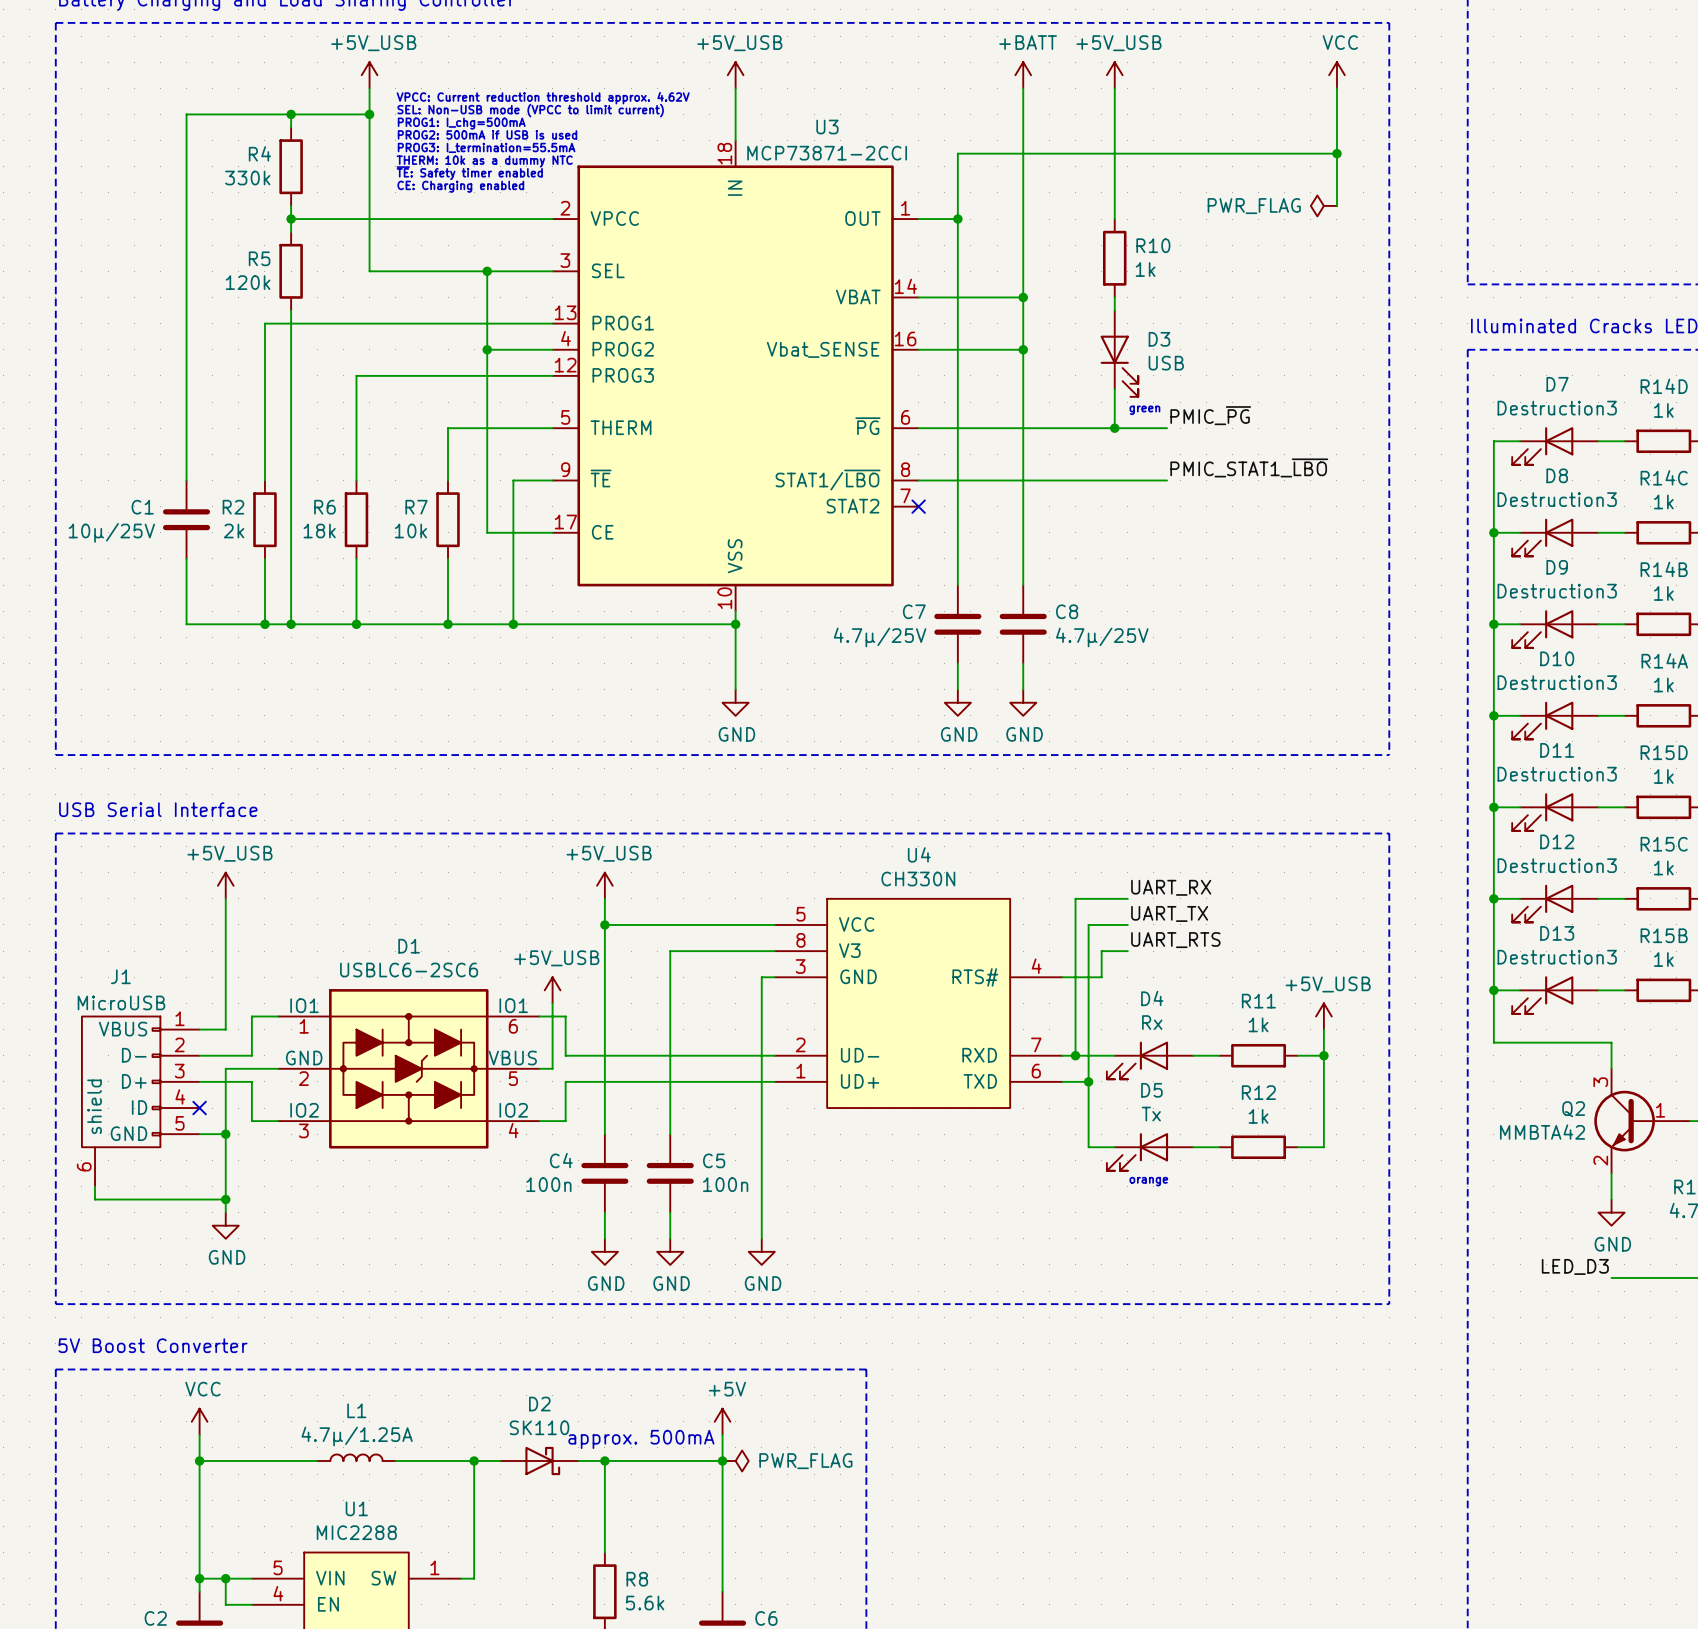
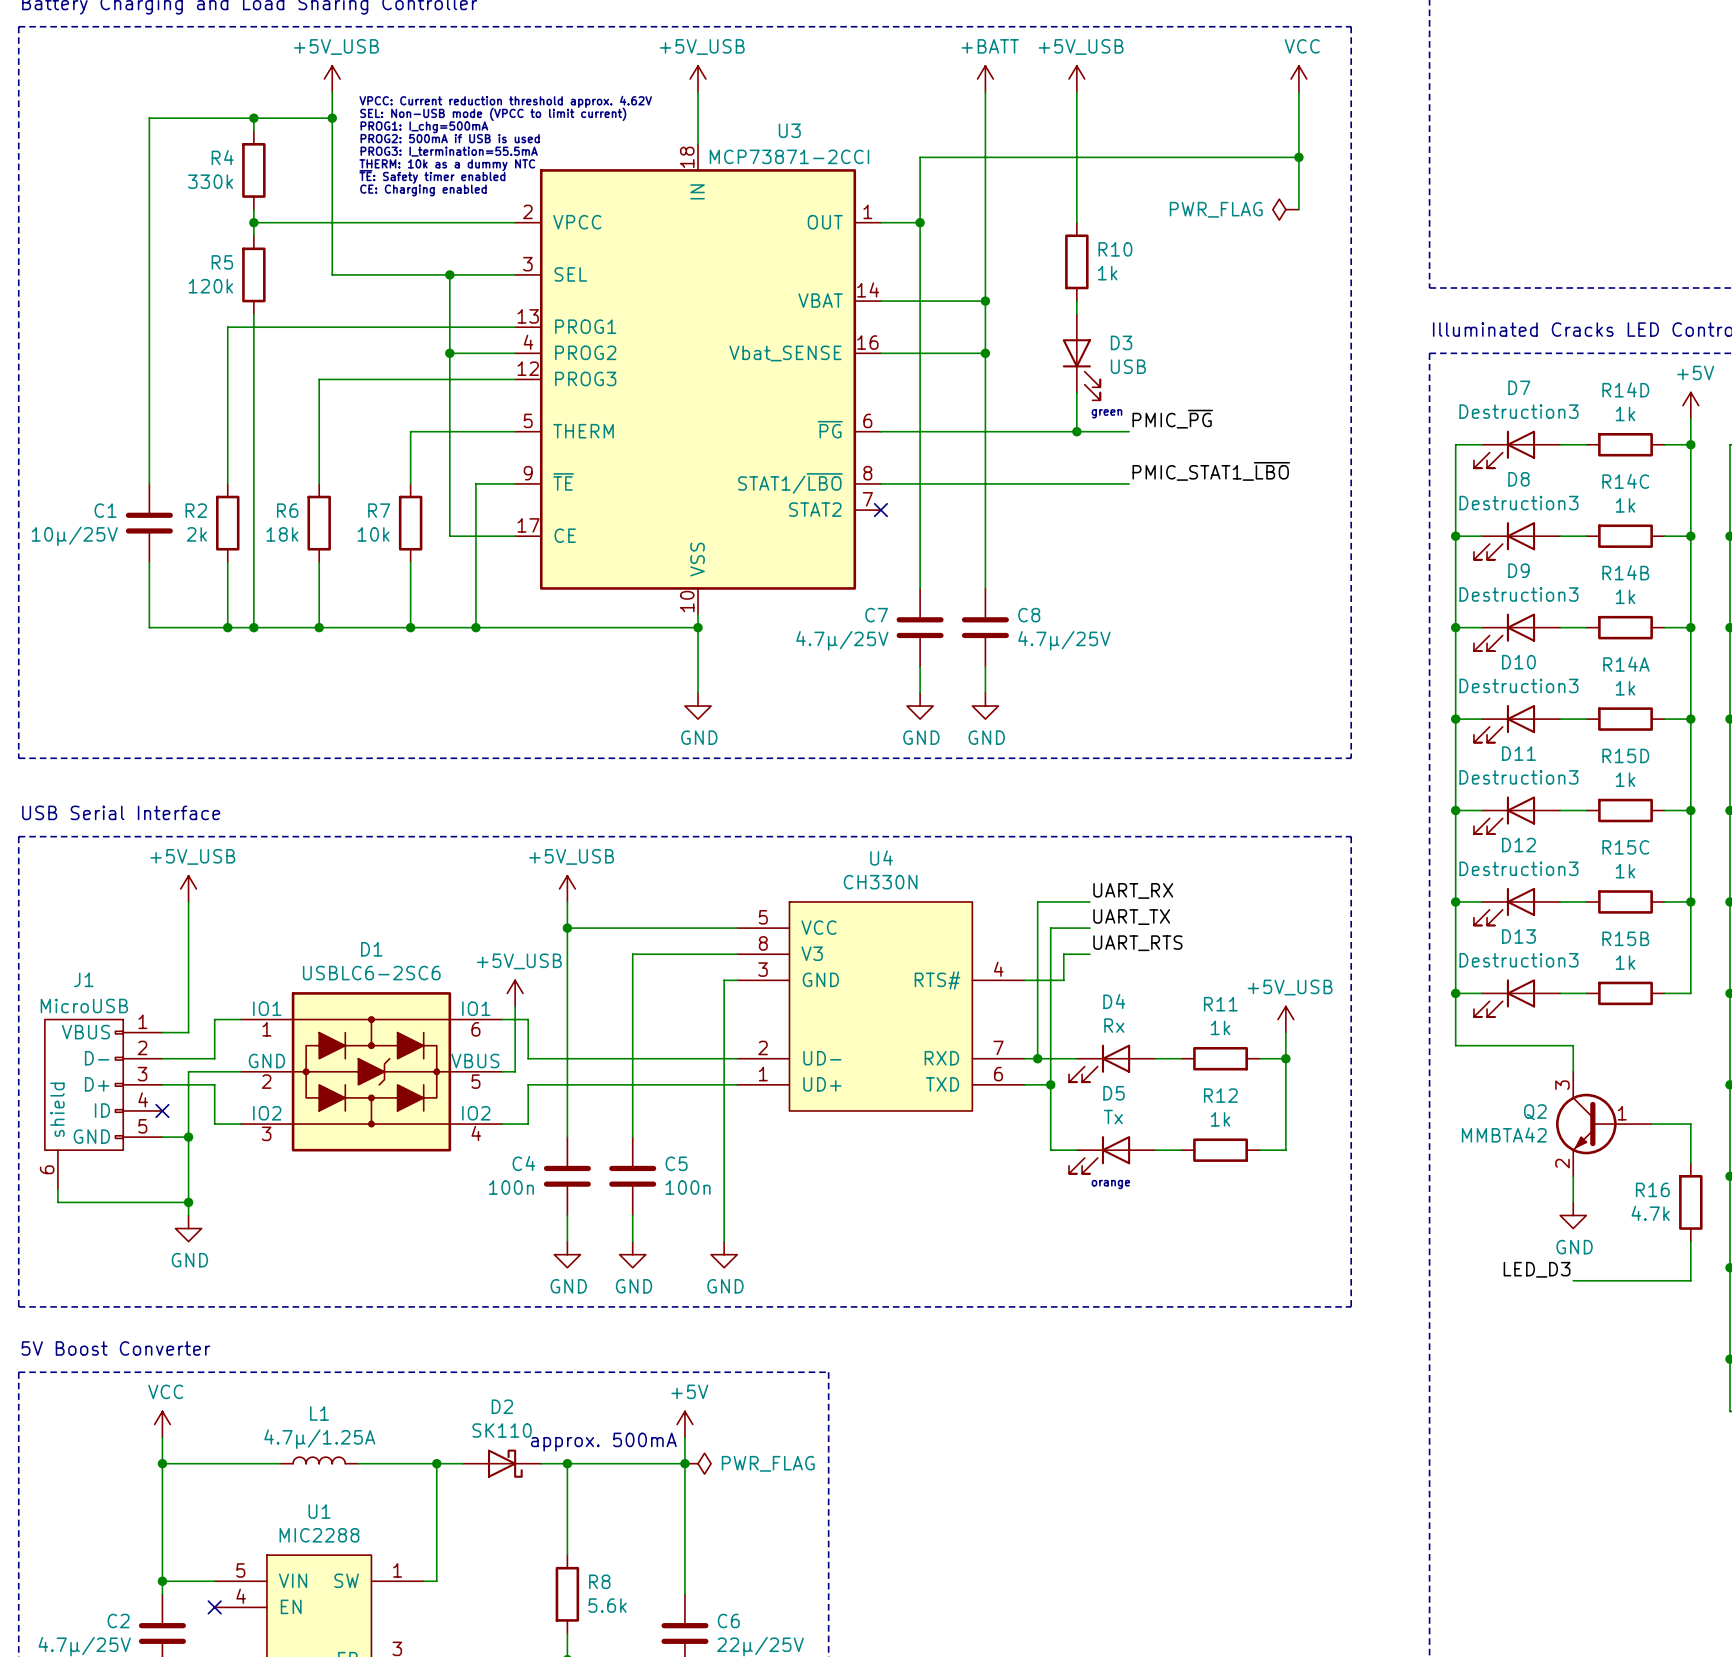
wire: (225, 1578) (225, 1604) (251, 1604) -> none
junction: (225, 1578) -> none
no-connect mark: none -> (214, 1607)

